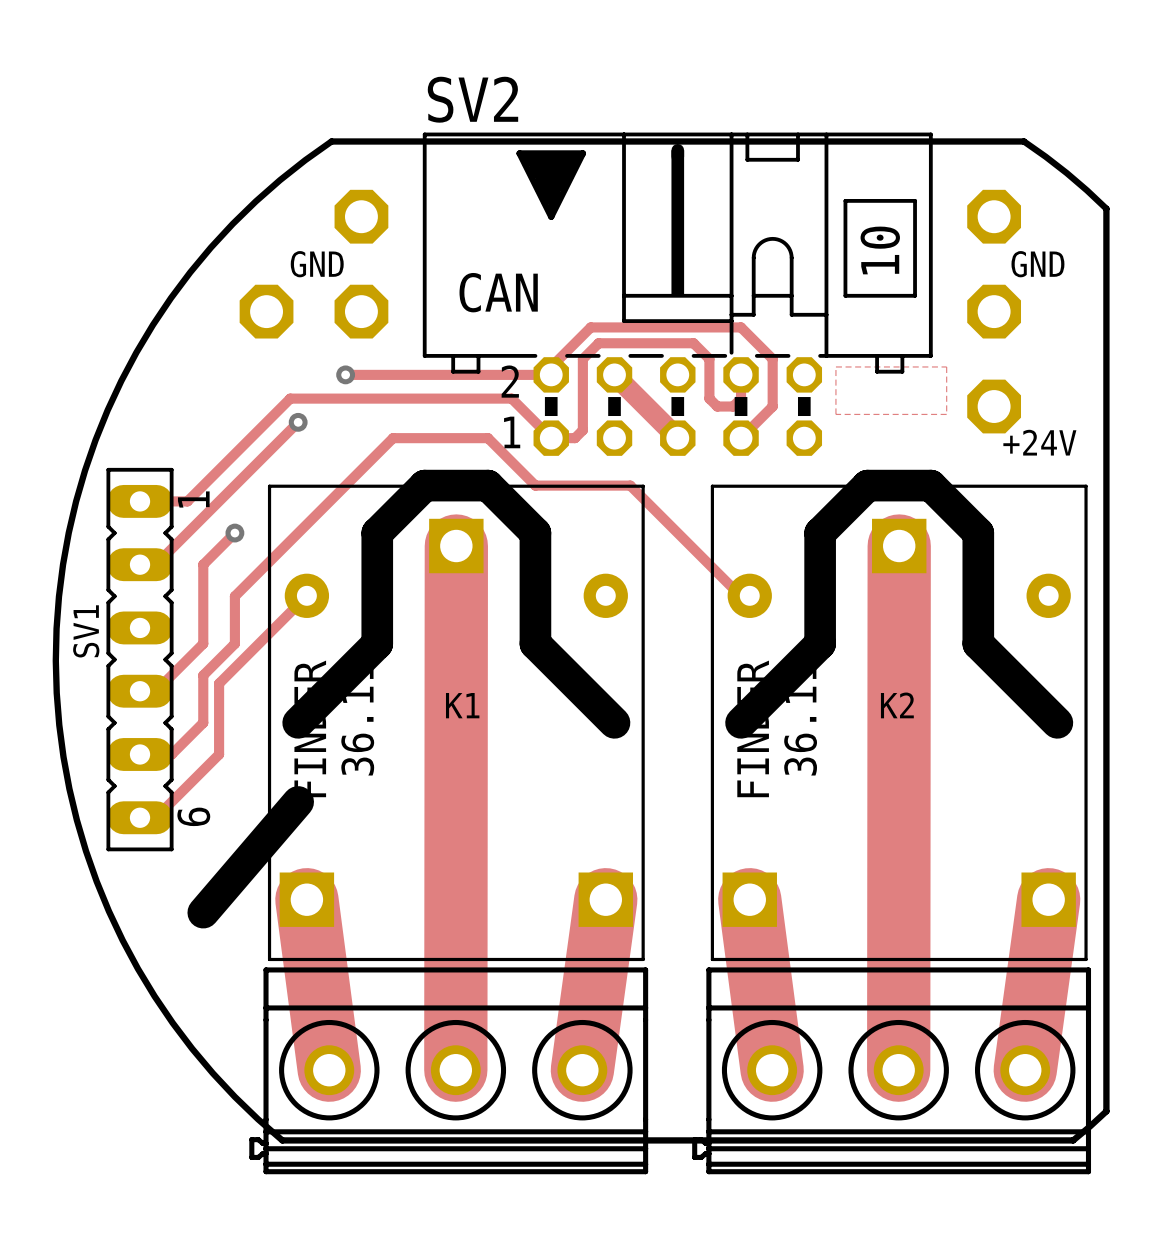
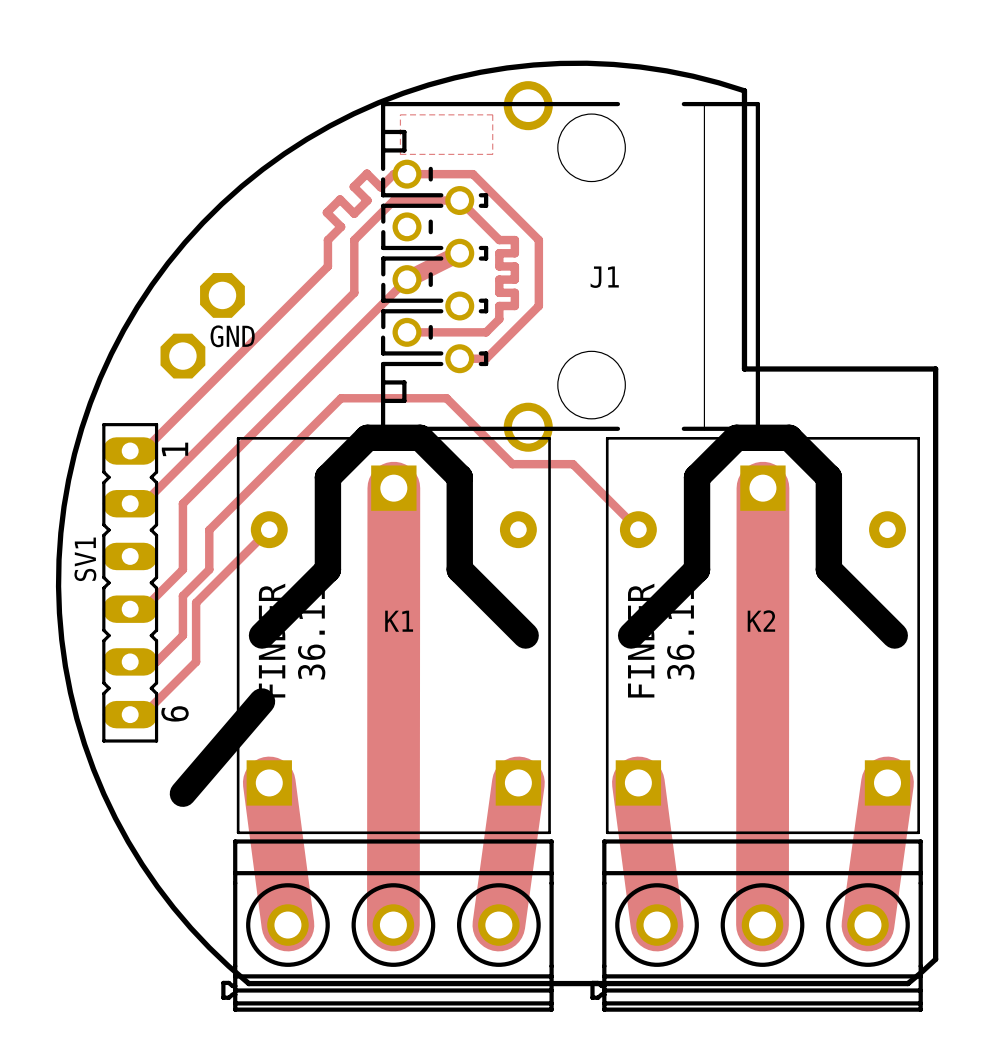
part: (361, 216) -> none
part: (994, 216) -> none
text position: GND (317, 264) -> GND (232, 336)
track: none -> (459, 253) (407, 279) (209, 477)
text: GND (1037, 264) -> none
J1: none -> (570, 266)
SV2: (677, 294) -> none
part position: (266, 311) -> (222, 295)
part: (361, 311) -> none
part: (994, 311) -> none
track: (590, 327) (551, 366) (551, 374) (345, 374) -> (505, 305) (499, 305) (499, 319) (486, 332) (407, 332)
track: (601, 327) (741, 327) (772, 359) (772, 406) (741, 438) -> (514, 305) (514, 292) (499, 292) (499, 279) (514, 279) (514, 266) (499, 266) (499, 253) (514, 253) (514, 240) (499, 240) (459, 200) (393, 200) (354, 240) (354, 292) (262, 385)
zone outline: (835, 366) (946, 366) (946, 414) (835, 414) (835, 366) -> (400, 114) (492, 114) (492, 154) (400, 154) (400, 114)
via: (345, 374) -> none
track: (614, 374) (677, 438) -> none
track: (741, 374) (741, 398) (733, 406) (717, 406) (709, 398) (709, 359) (693, 343) (598, 343) (582, 359) (582, 430) (574, 438) (551, 438) (511, 398) (290, 398) (187, 501) (155, 501) -> (459, 358) (486, 358) (538, 305) (538, 240) (472, 174) (393, 174) (380, 187) (366, 173) (353, 186) (367, 200) (354, 213) (340, 199) (326, 212) (341, 226) (327, 240) (327, 266) (143, 450)
part: none -> (182, 356)
board edge: (1106, 403) (1106, 208) (1066, 173) (1024, 141) (331, 141) (305, 160) (255, 201) (210, 247) (170, 298) (136, 352) (107, 410) (85, 470) (68, 532) (58, 596) (55, 660) (56, 693) (63, 757) (76, 820) (96, 881) (122, 940) (154, 996) (192, 1048) (234, 1096) (282, 1140) -> (935, 368) (744, 368) (744, 90) (693, 76) (613, 64) (560, 63) (507, 67) (428, 84) (353, 113) (306, 139) (262, 169) (221, 204) (184, 242) (137, 307) (111, 353) (90, 403) (74, 454) (64, 506) (59, 559) (59, 613) (65, 666) (76, 718) (93, 769) (115, 818) (142, 864) (173, 907) (209, 947) (248, 983)
part: (994, 406) -> none
via: (298, 422) -> none
track: (487, 438) (535, 485) (630, 485) (741, 596) (749, 595) -> (420, 398) (446, 398) (512, 464) (572, 464) (638, 529)
text: +24V (1039, 442) -> none
via: (234, 533) -> none

